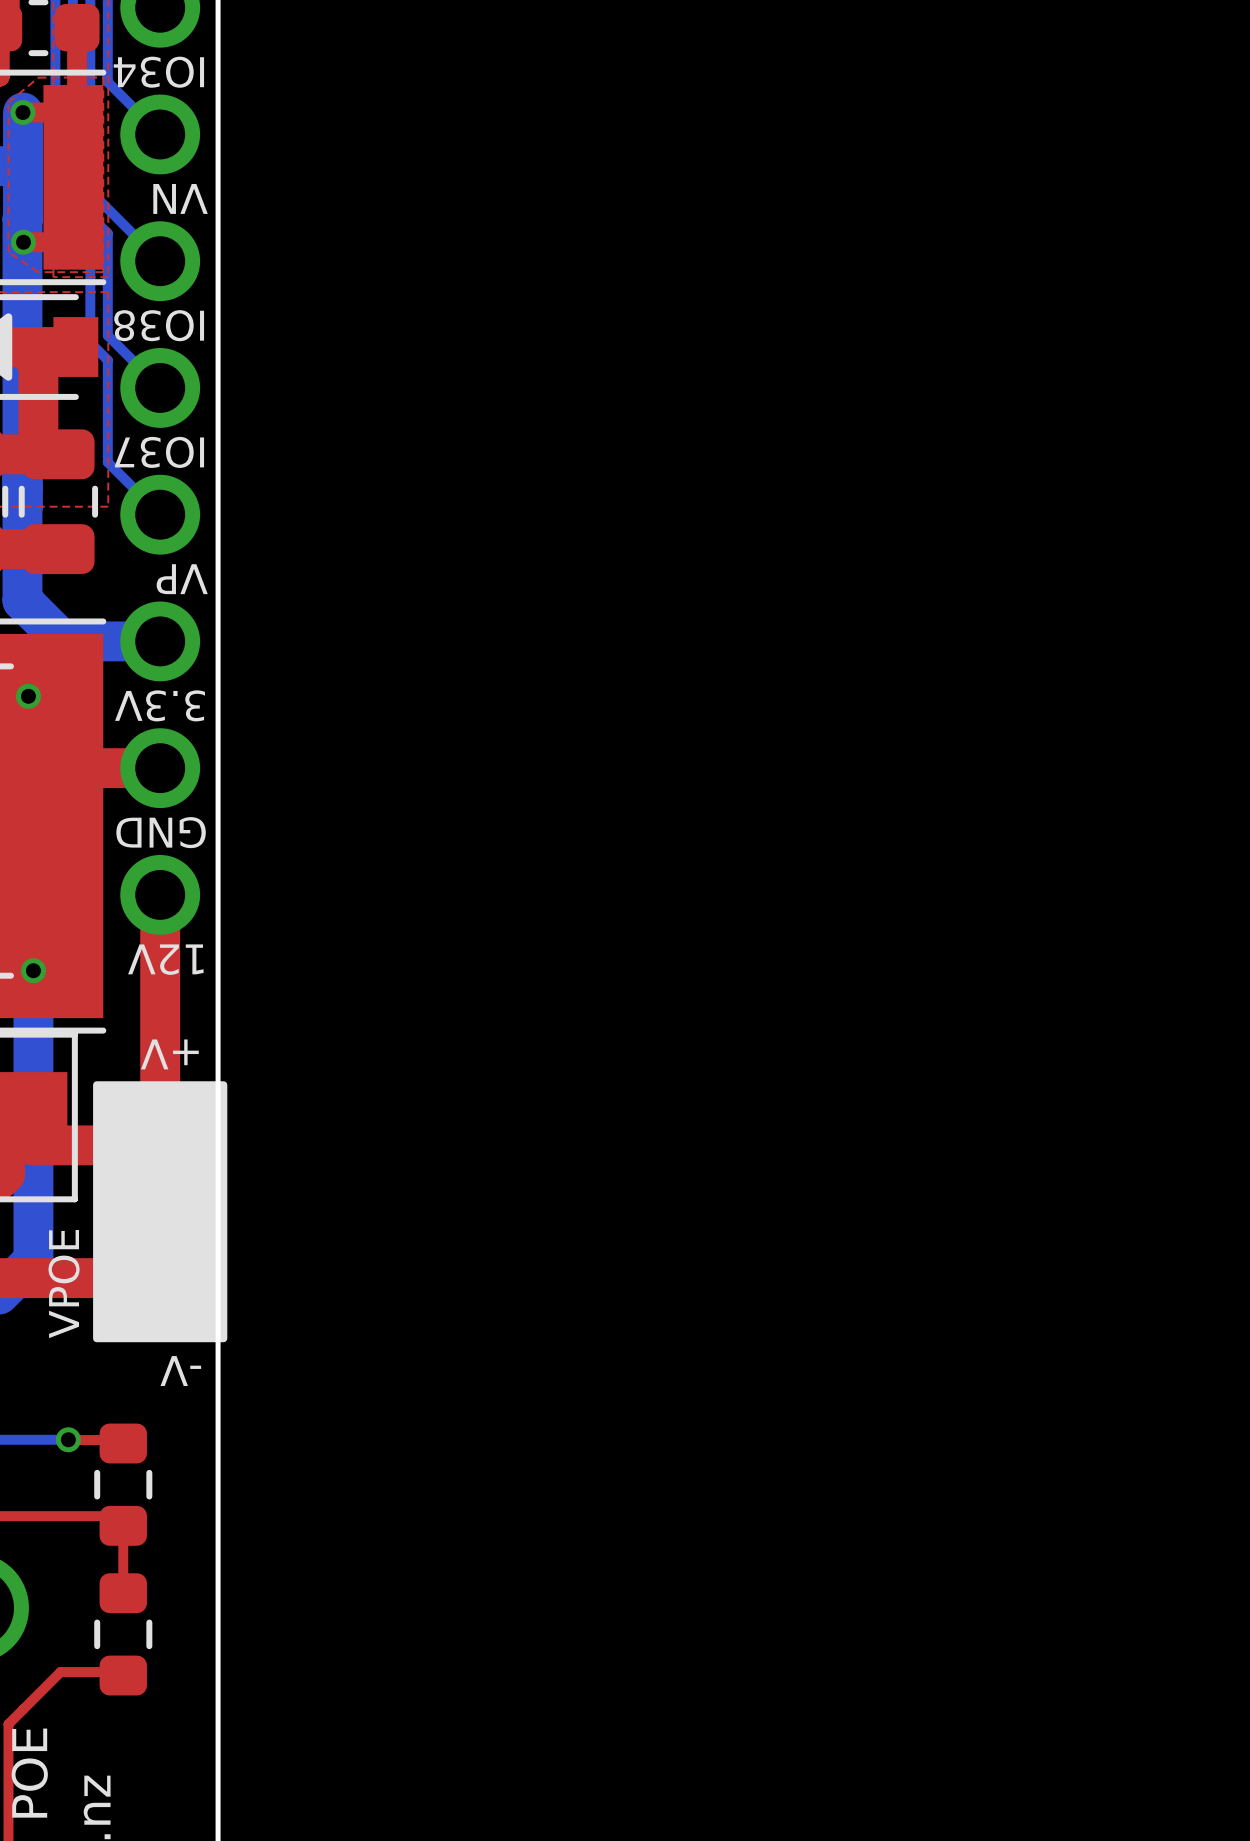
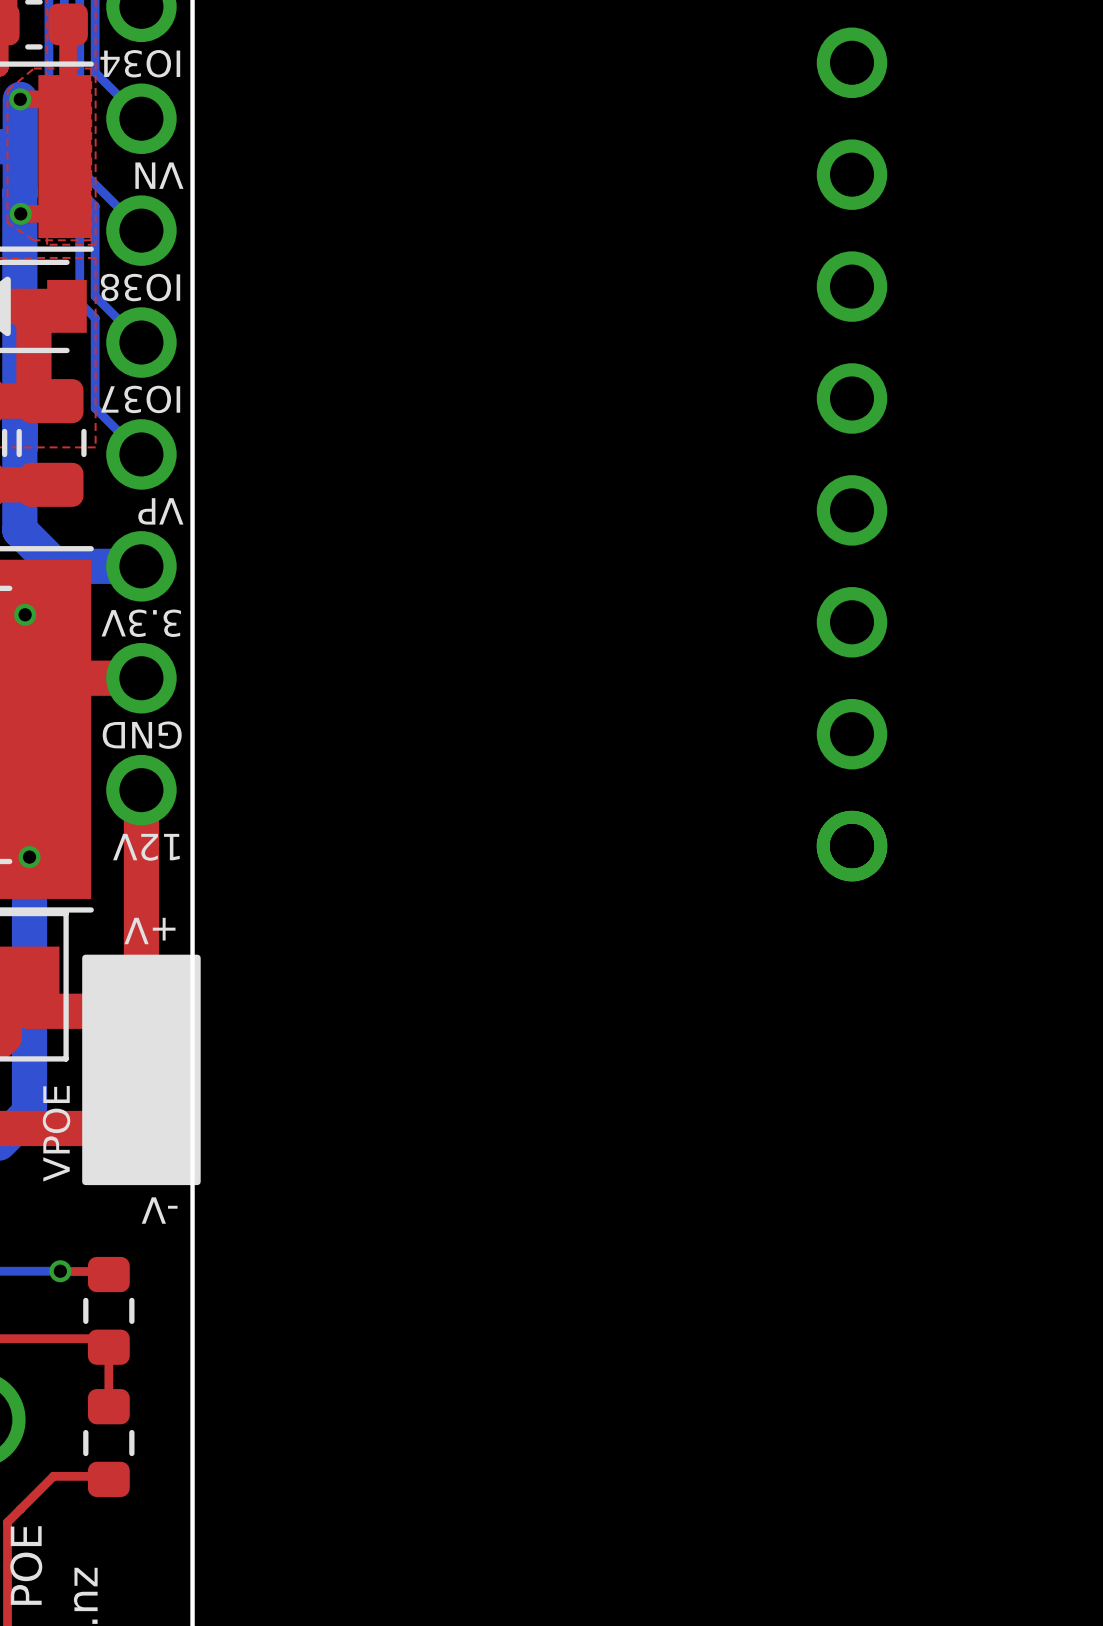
part: none -> (852, 62)
part: none -> (852, 174)
part: none -> (852, 286)
part: none -> (852, 398)
part: none -> (852, 510)
part: none -> (852, 622)
part: none -> (852, 734)
part: none -> (852, 846)

